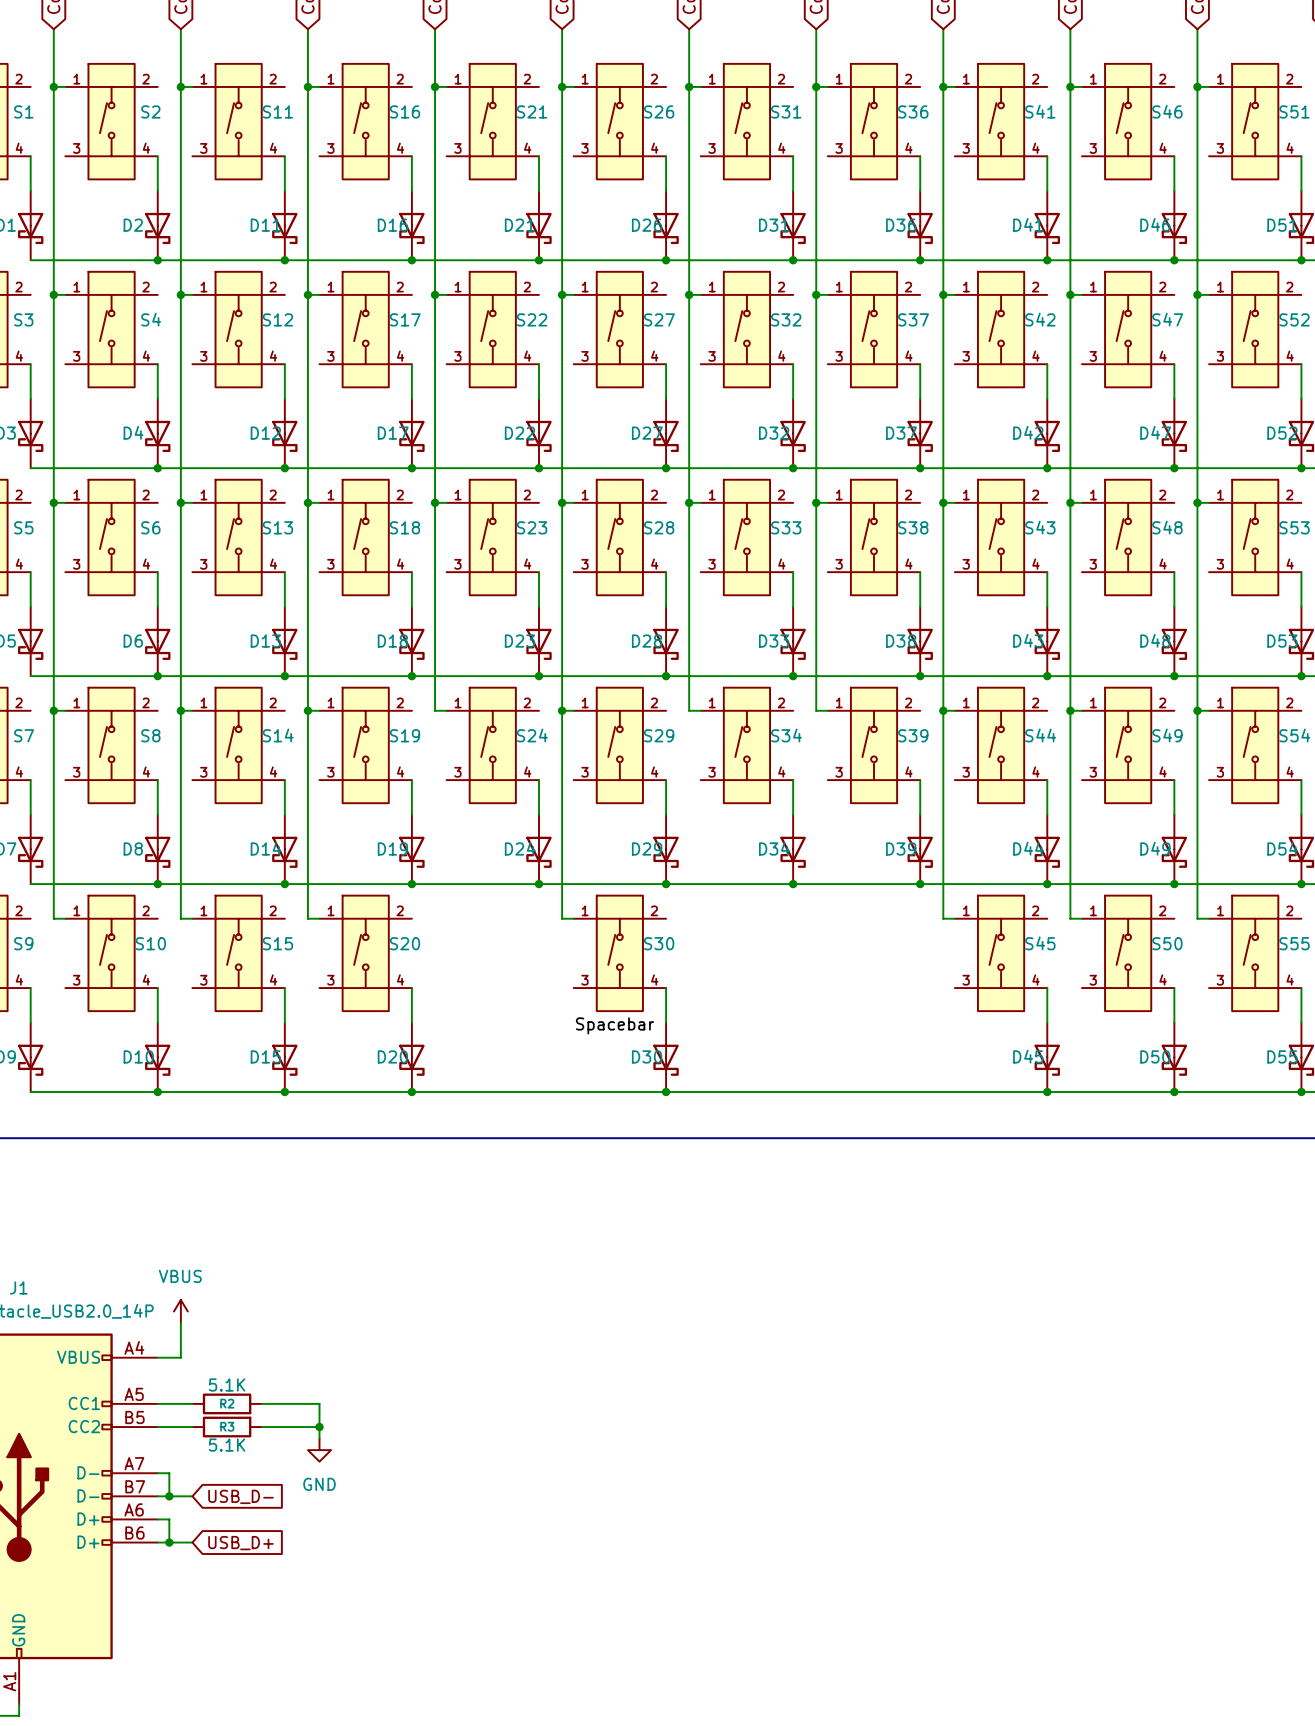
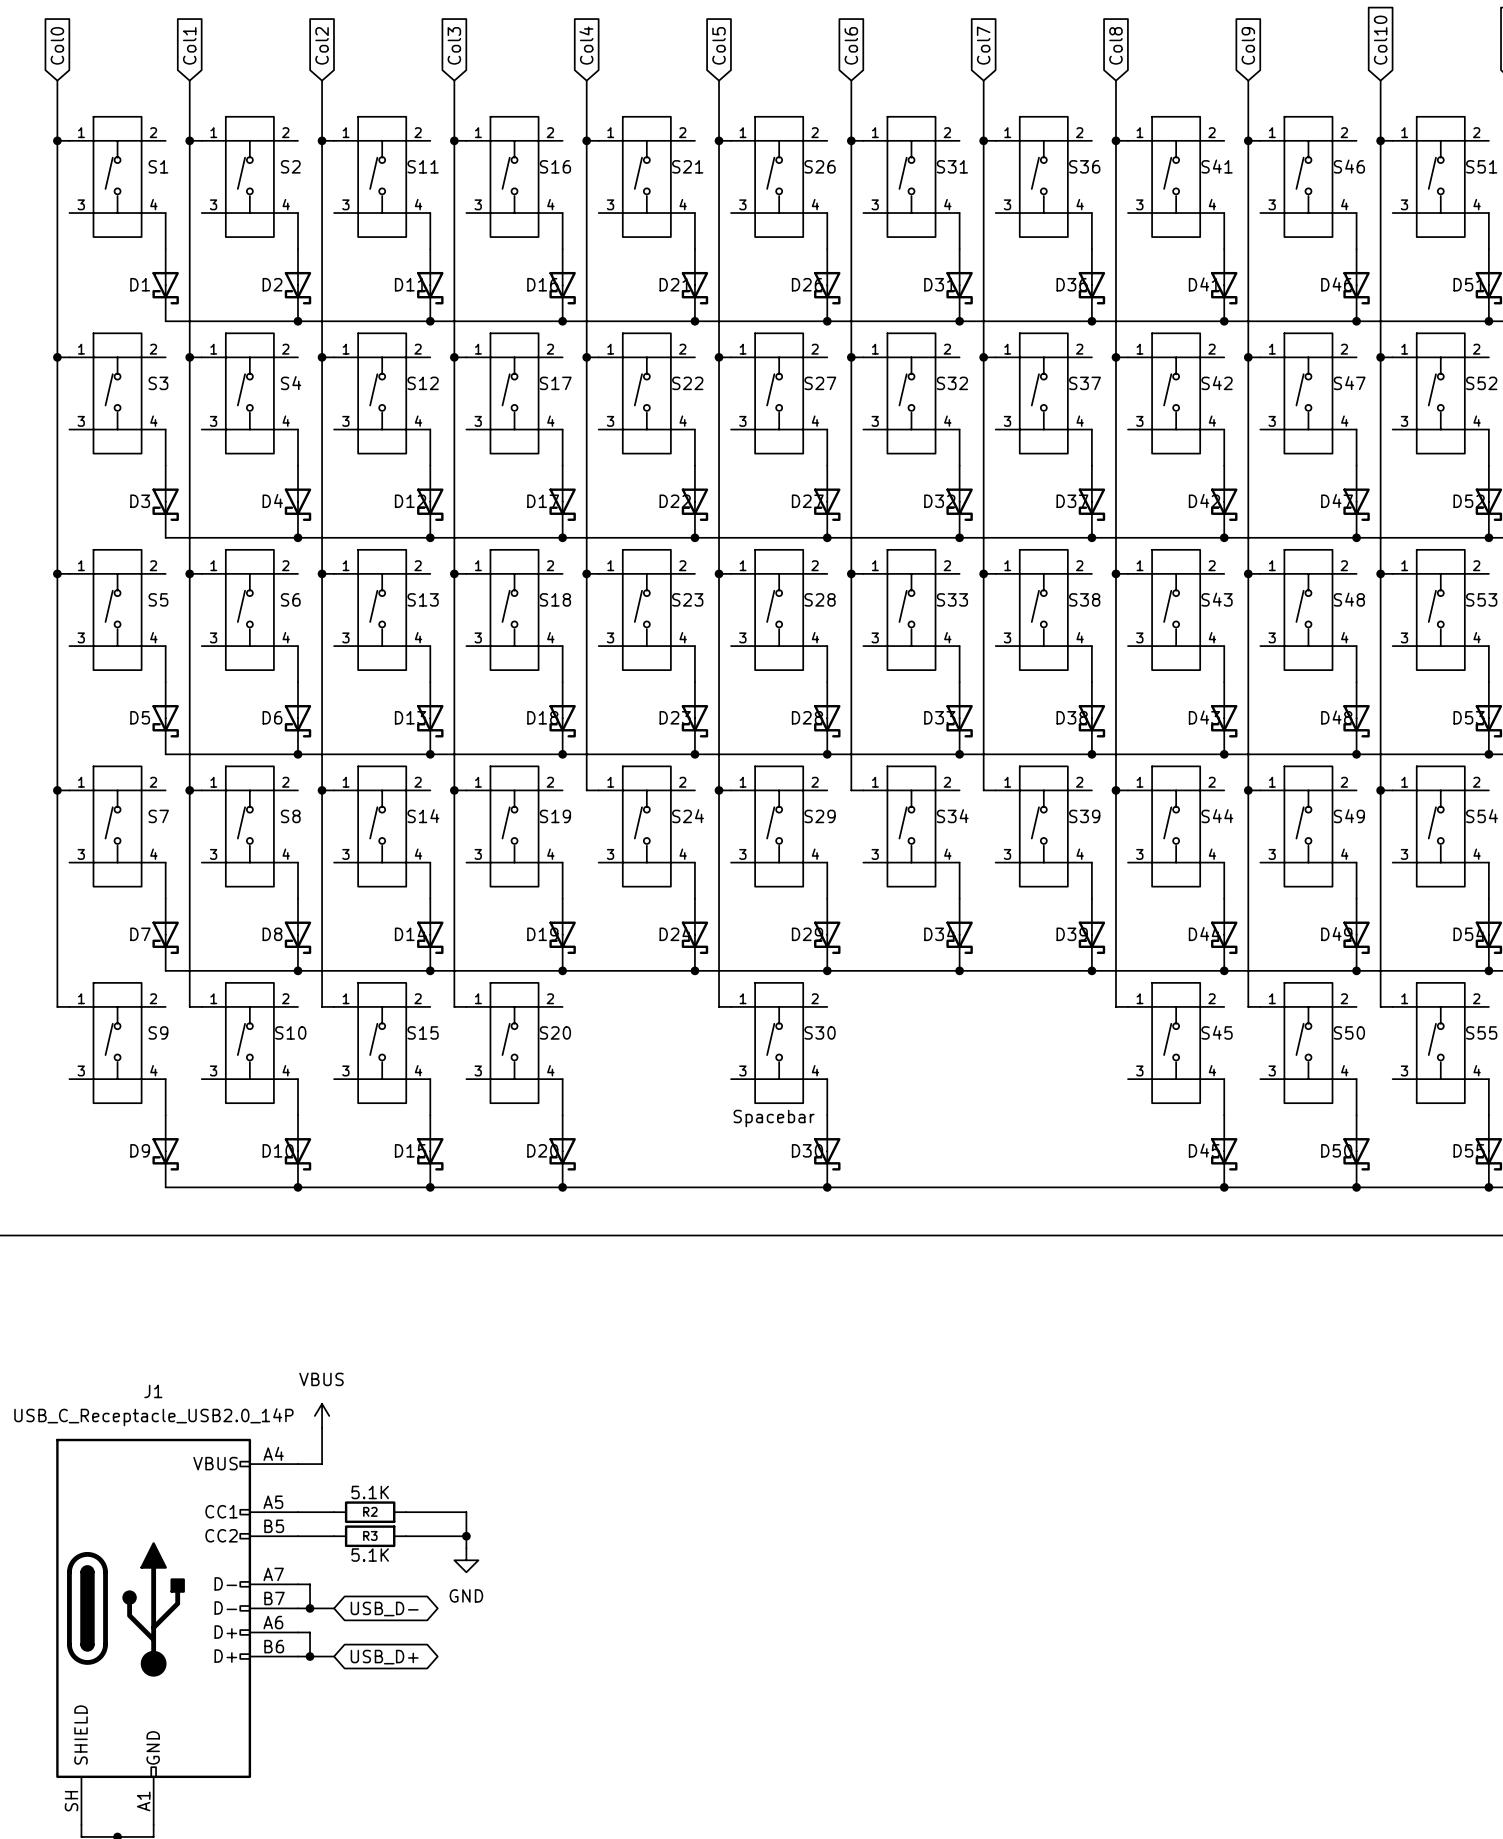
global label shape: input (240, 1496) -> bidirectional (384, 1608)
global label shape: input (240, 1543) -> bidirectional (384, 1657)

